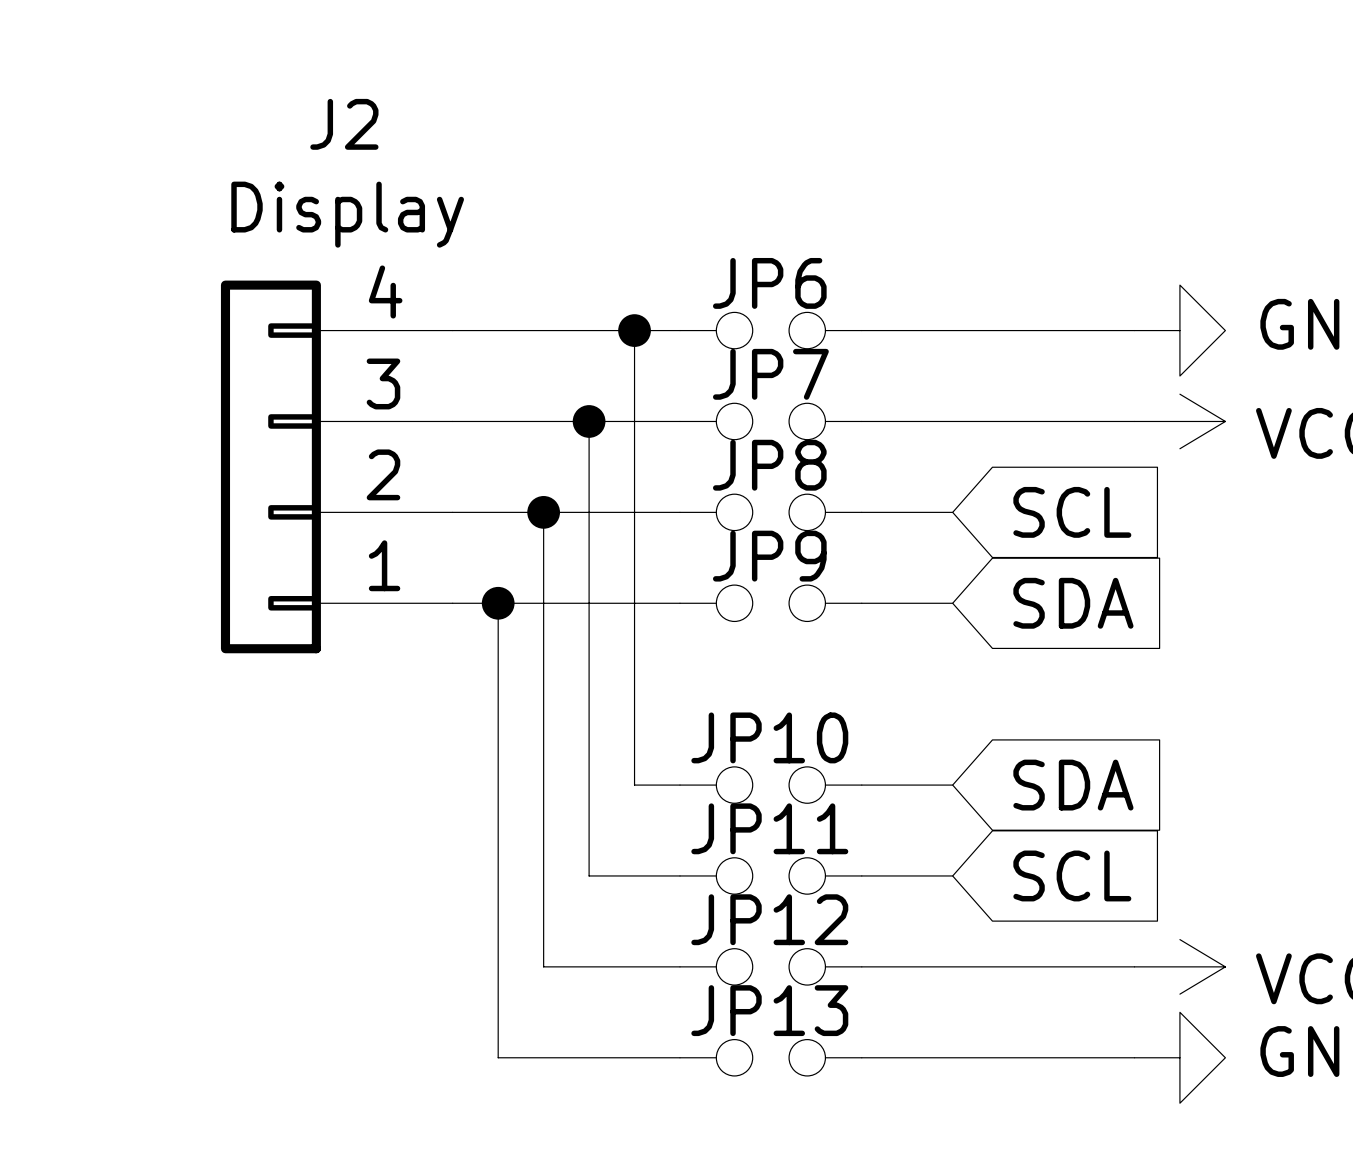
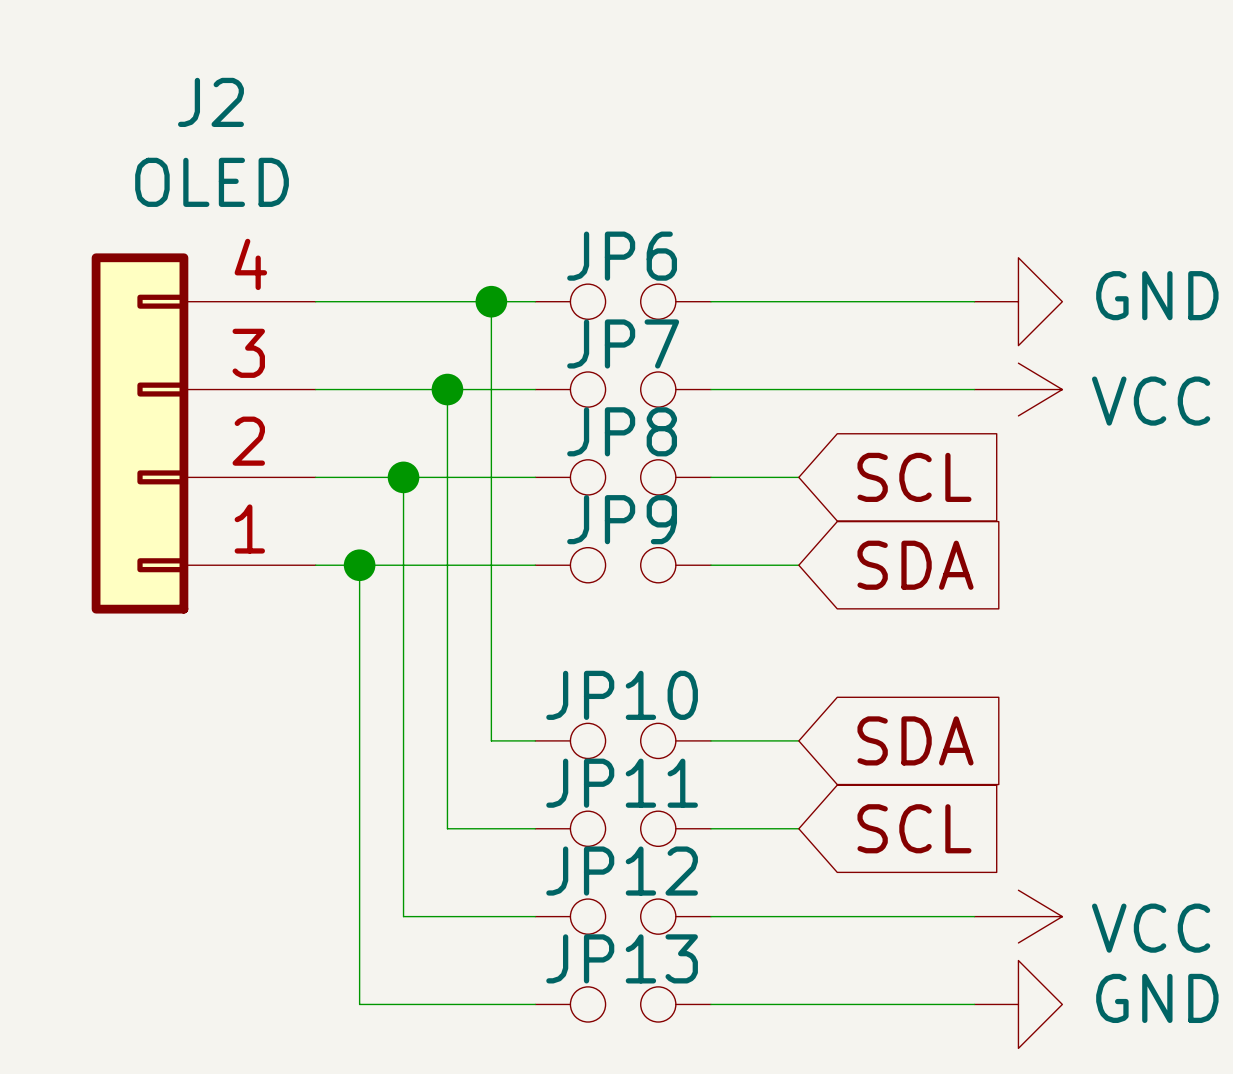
J2 value: Display (347, 214) -> OLED (212, 182)

